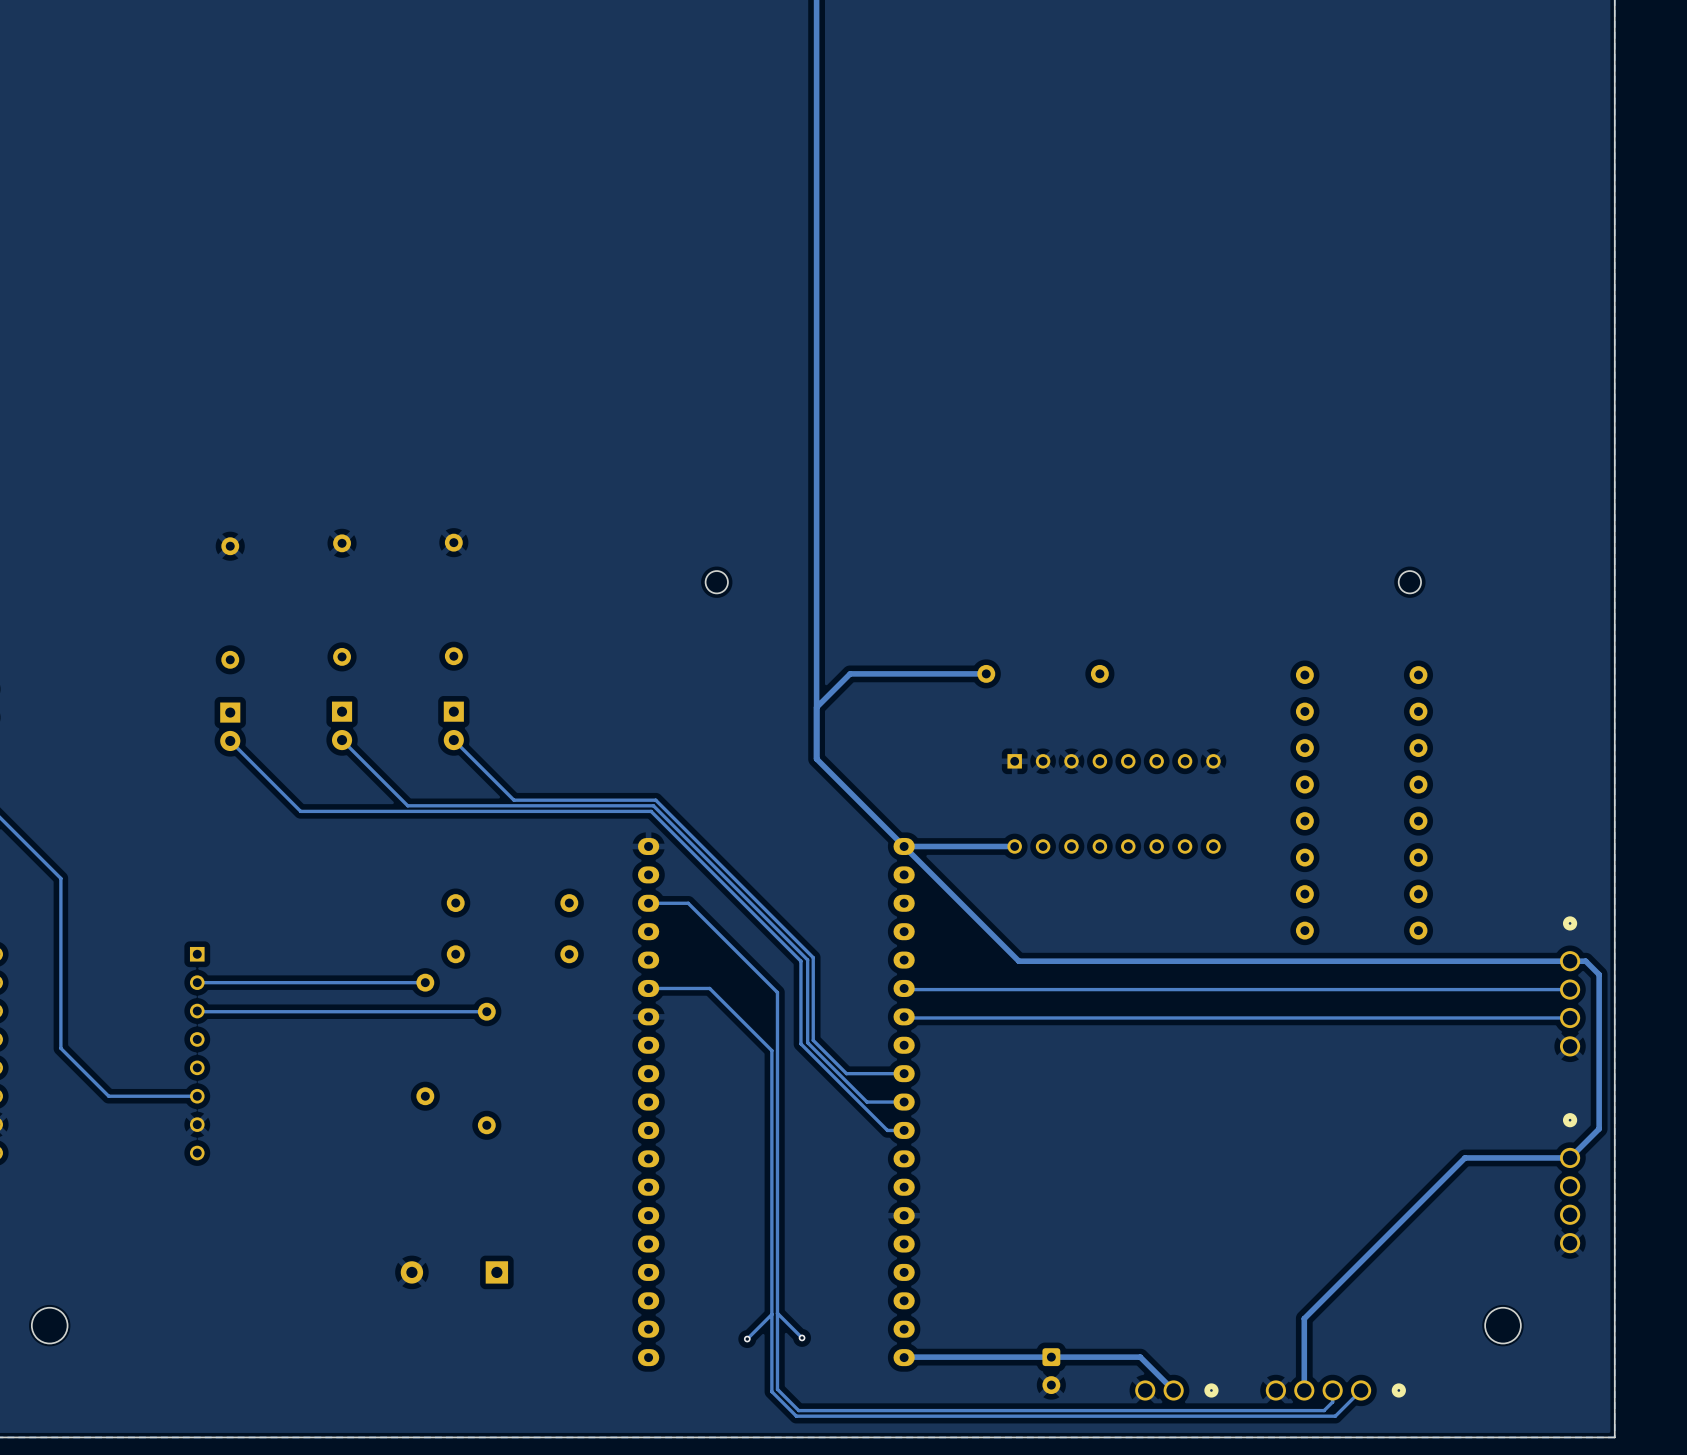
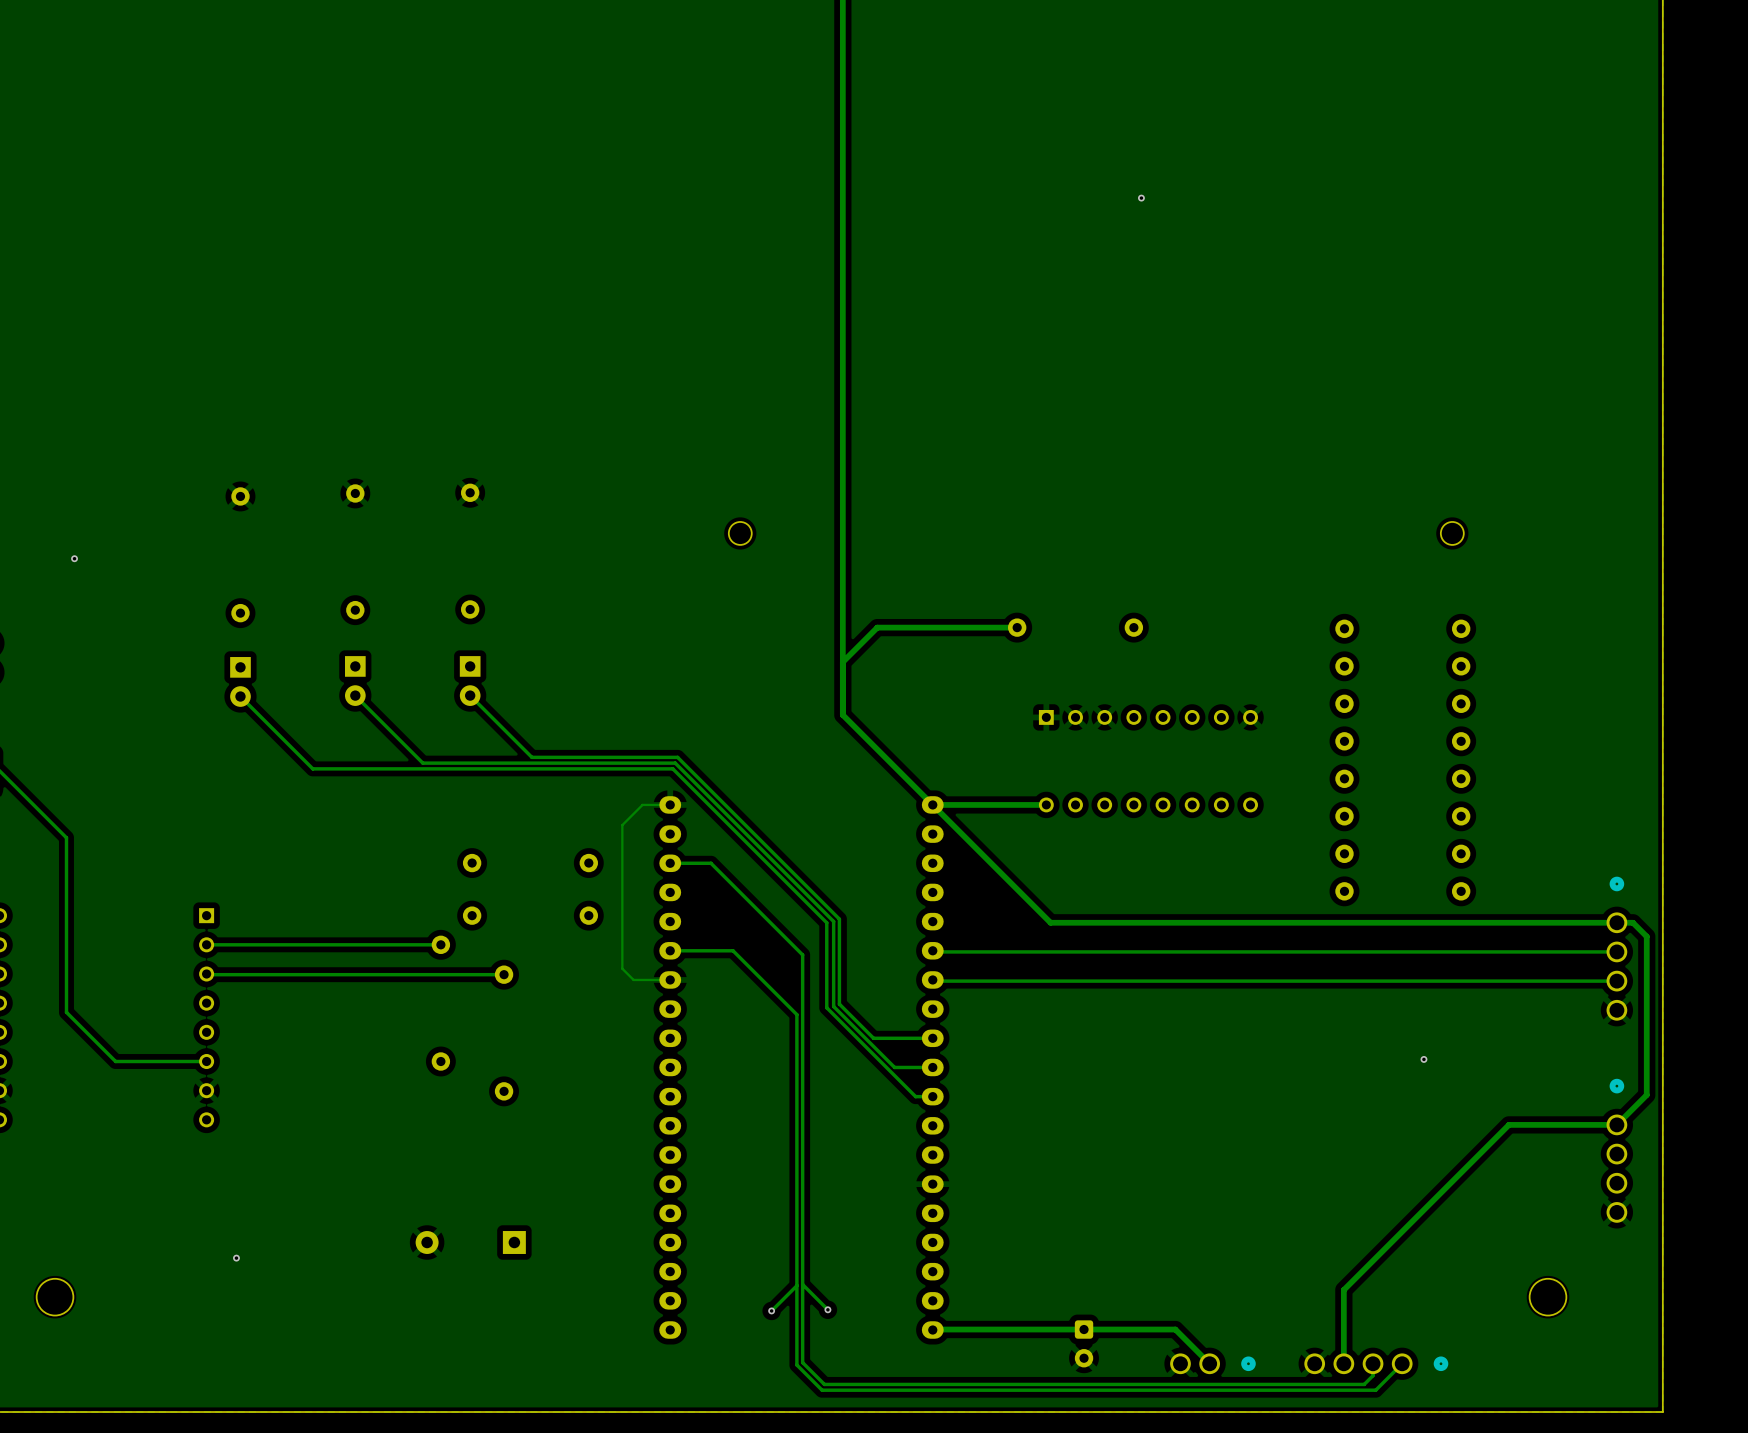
via: none -> (1141, 198)
via: none -> (74, 558)
track: none -> (670, 804) (642, 804) (622, 825) (622, 968) (633, 979) (670, 979)
via: none -> (1423, 1059)
via: none -> (236, 1258)

